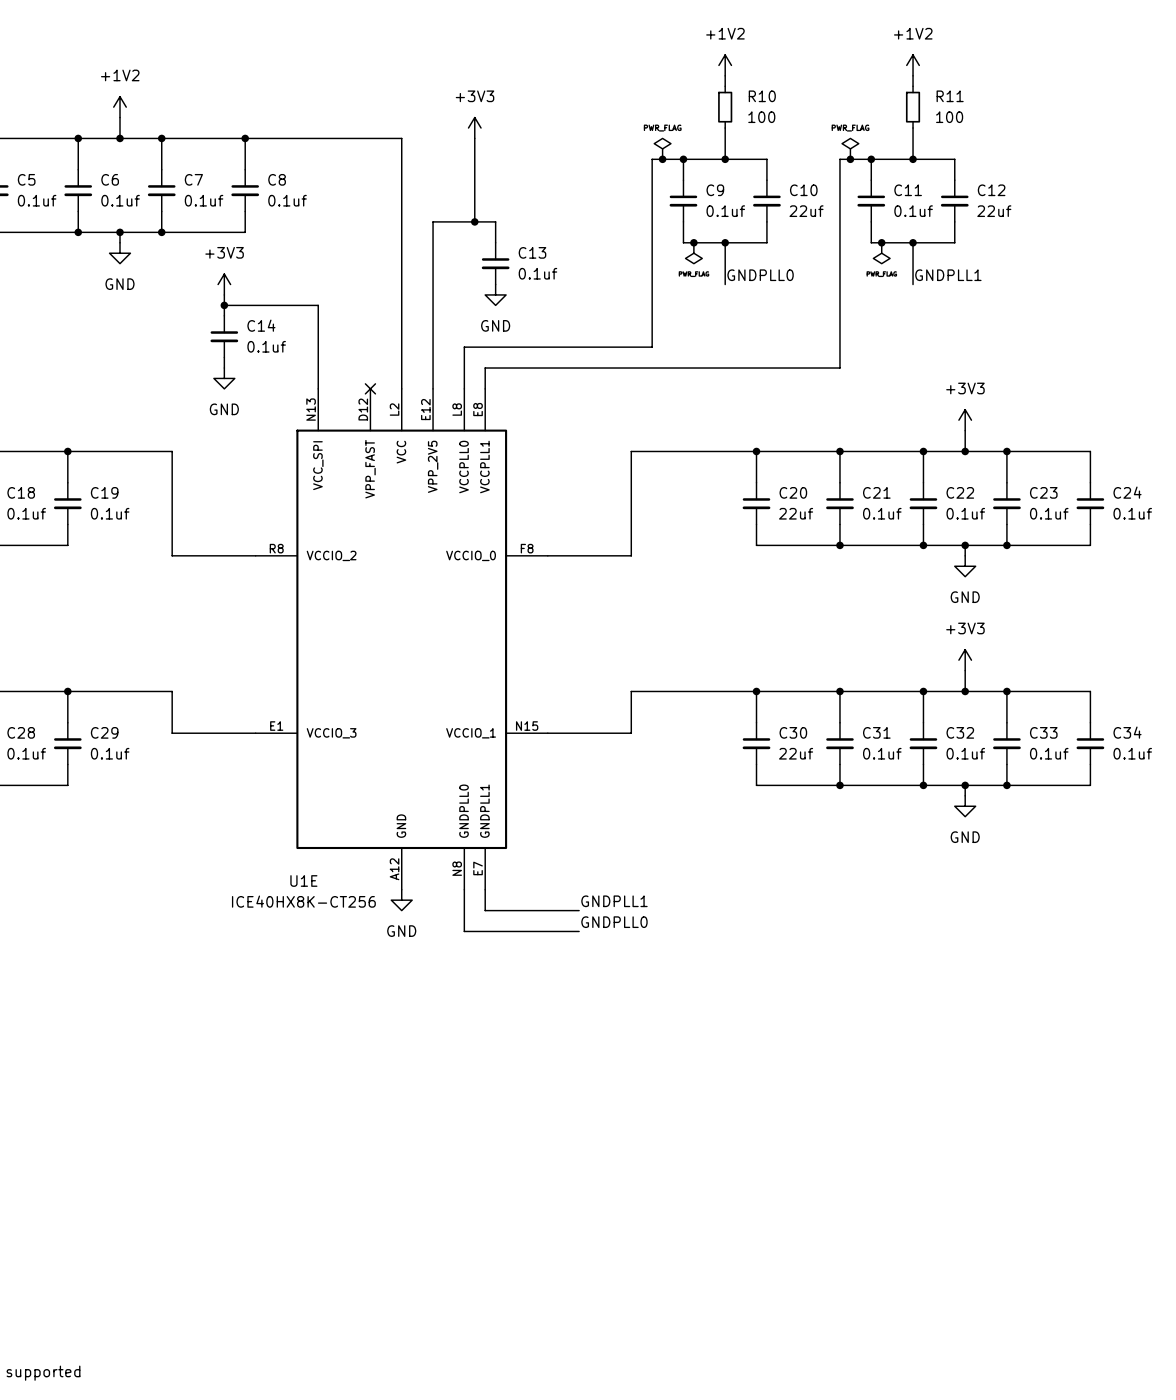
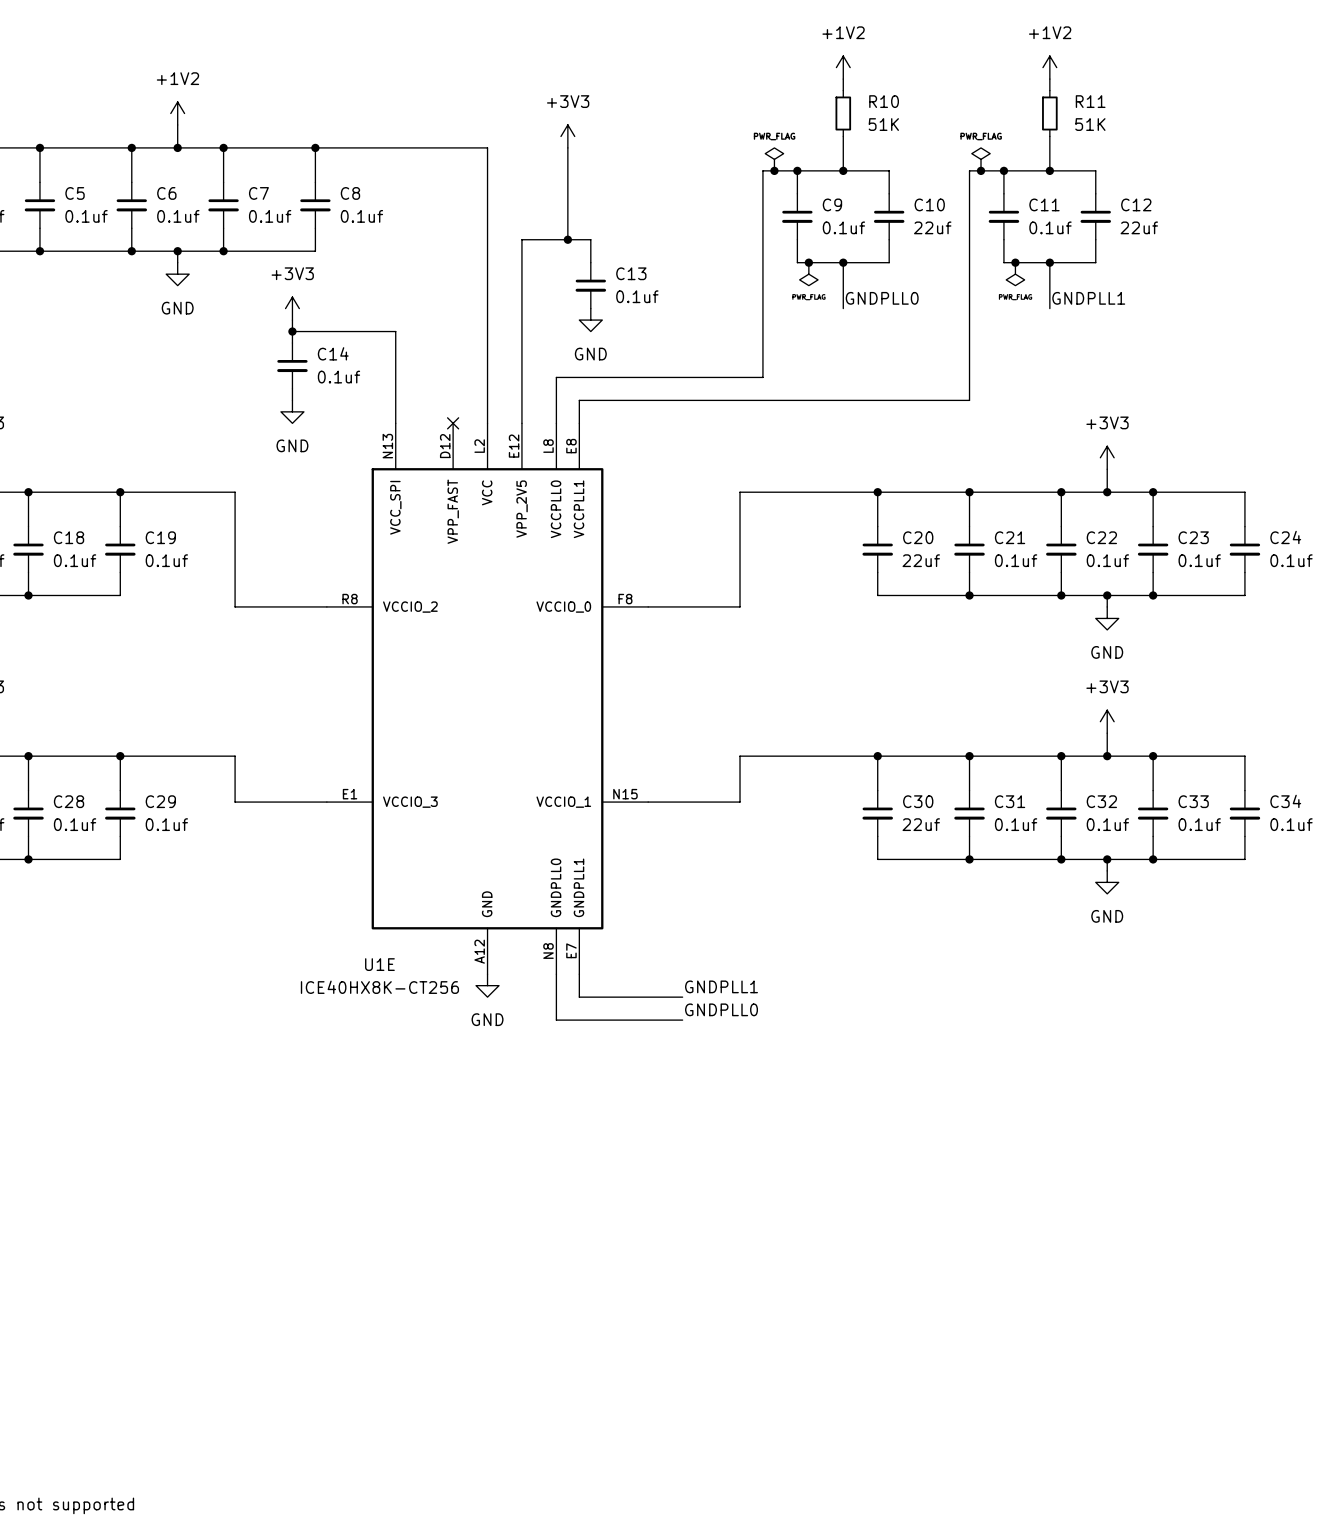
R10 value: 100 (761, 117) -> 51K (883, 124)
R11 value: 100 (949, 117) -> 51K (1090, 124)

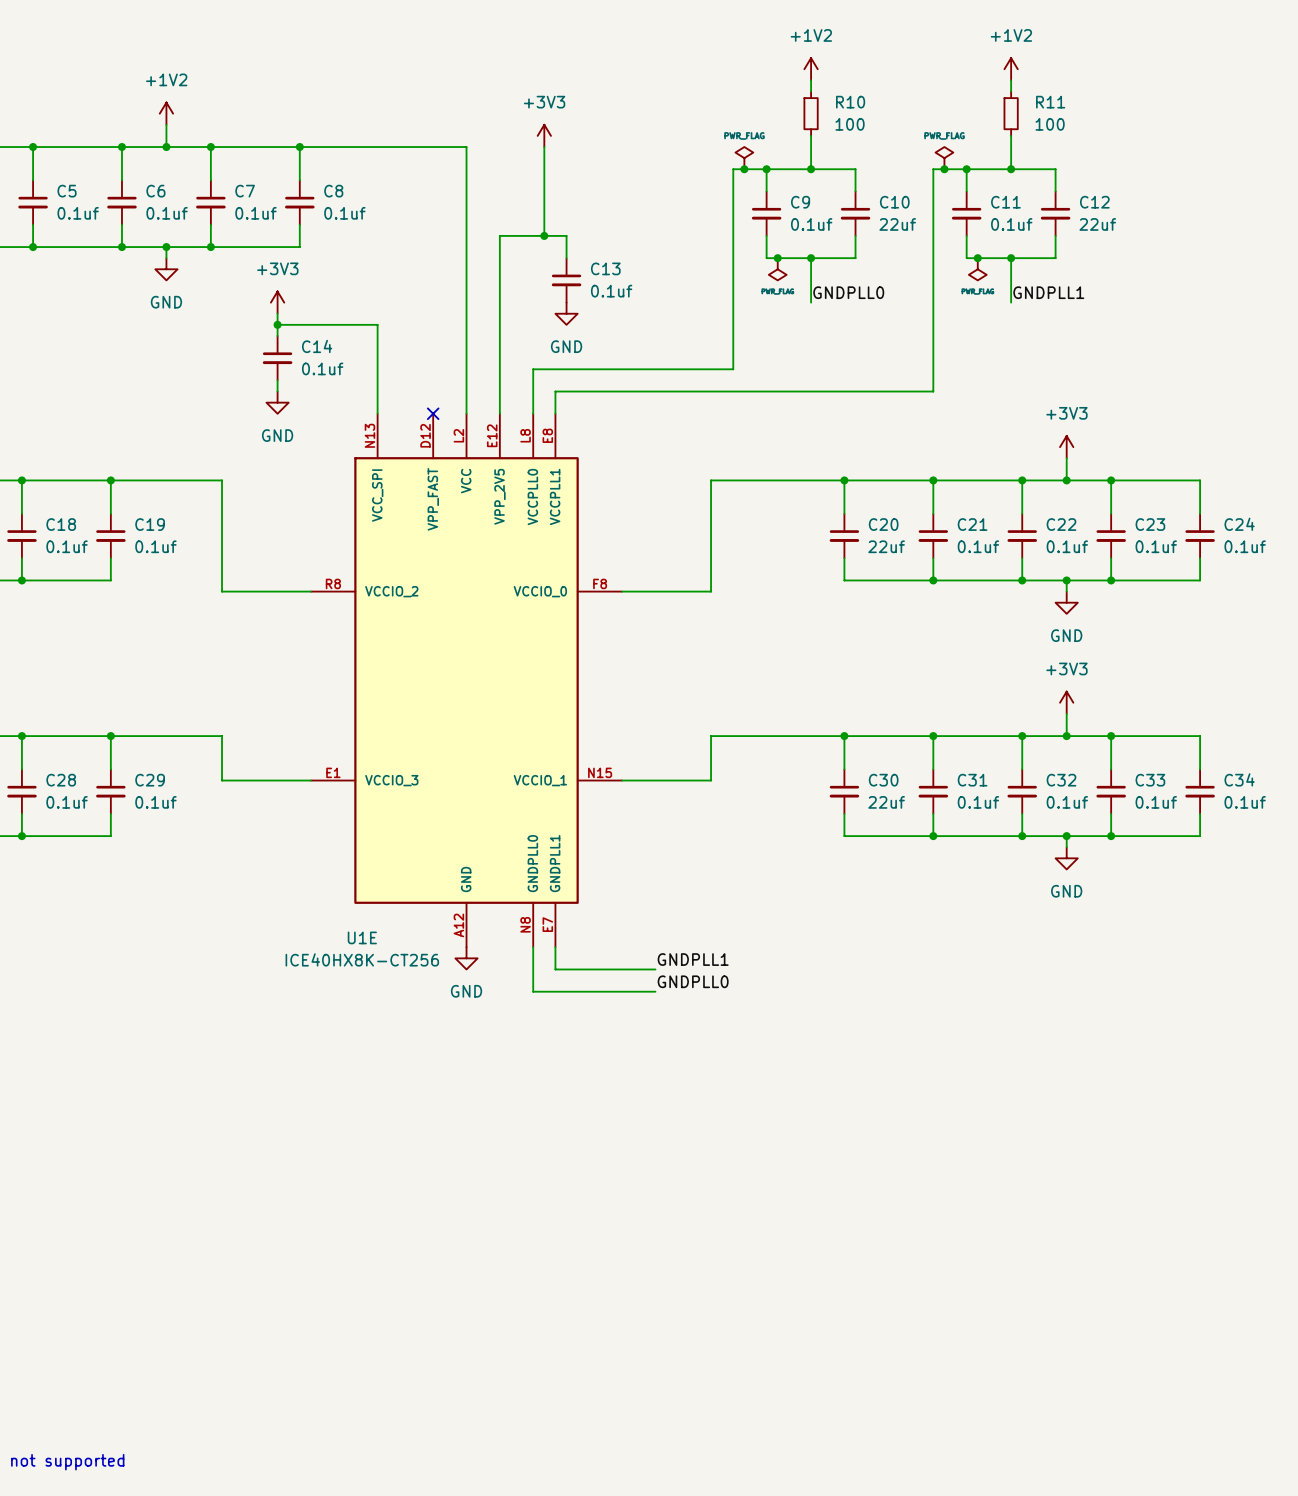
R10 value: 51K (883, 124) -> 100 (850, 124)
R11 value: 51K (1090, 124) -> 100 (1050, 124)

